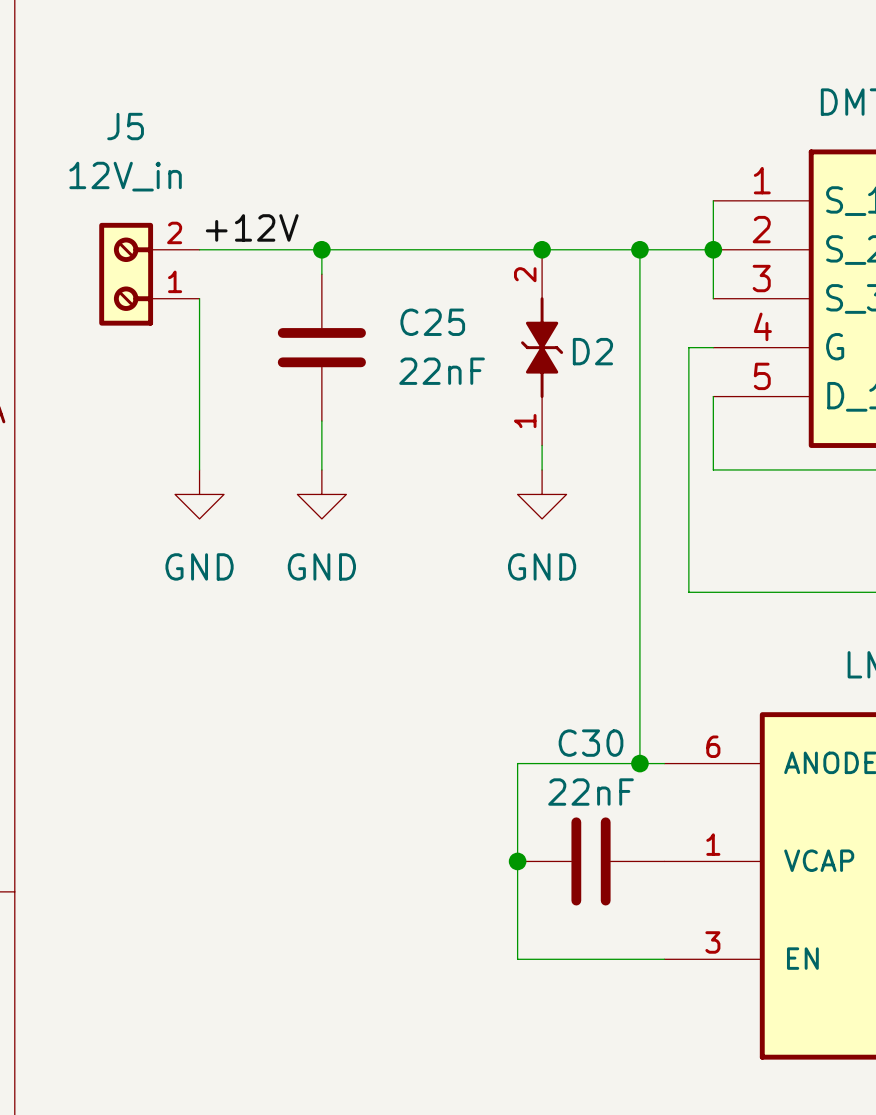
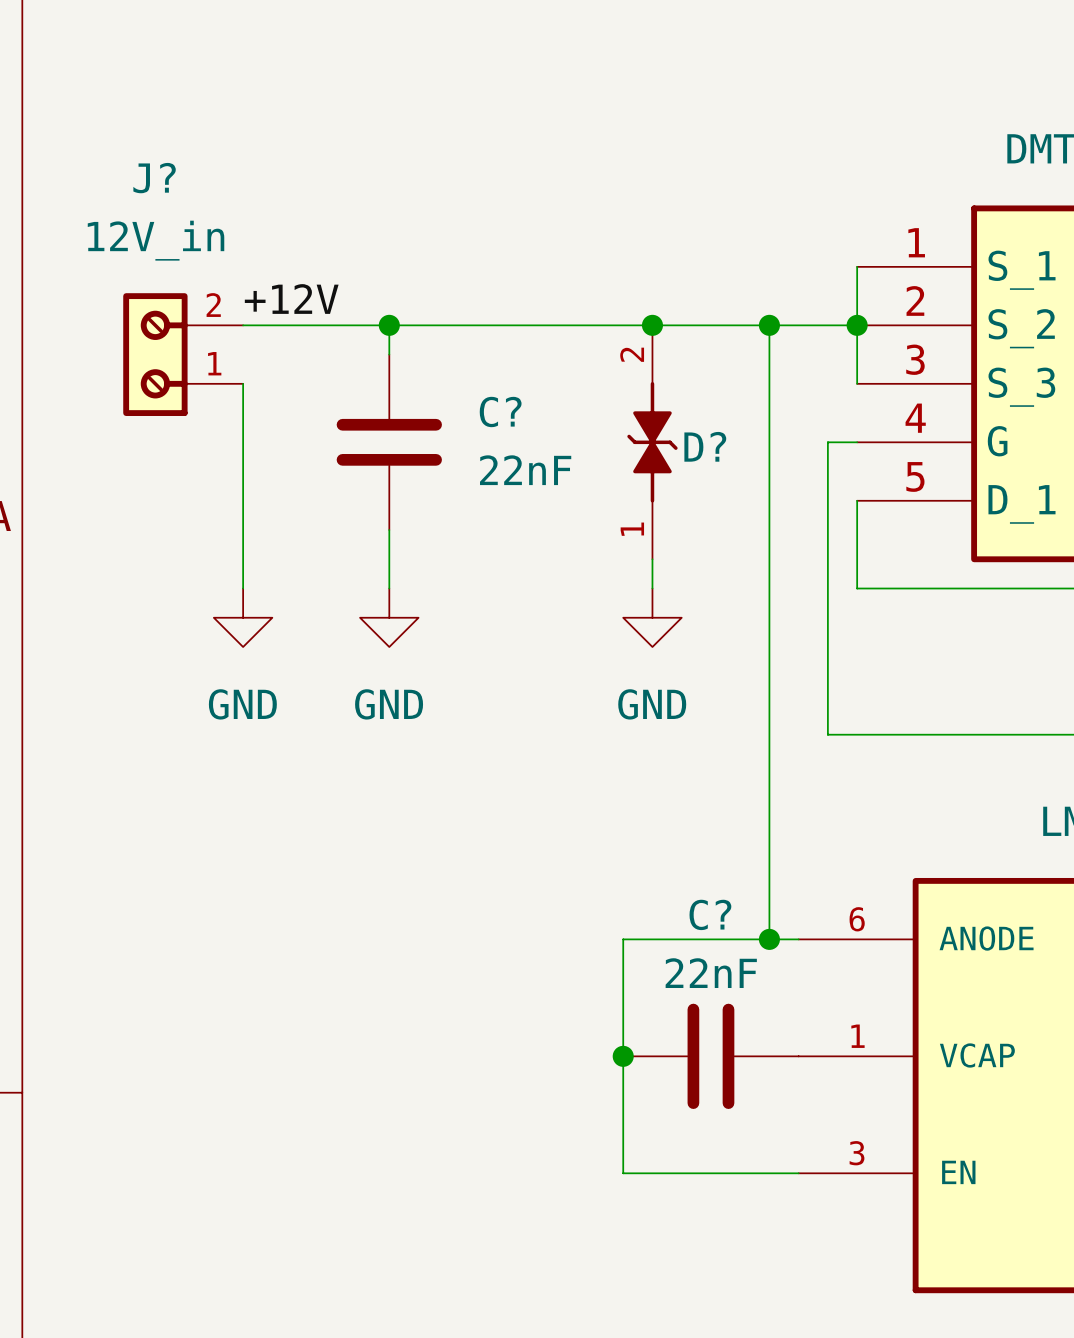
J5 name: J5 (125, 126) -> J? (154, 178)
C25 name: C25 (432, 322) -> C? (500, 412)
D2 name: D2 (592, 351) -> D? (705, 446)
C30 name: C30 (591, 743) -> C? (710, 914)

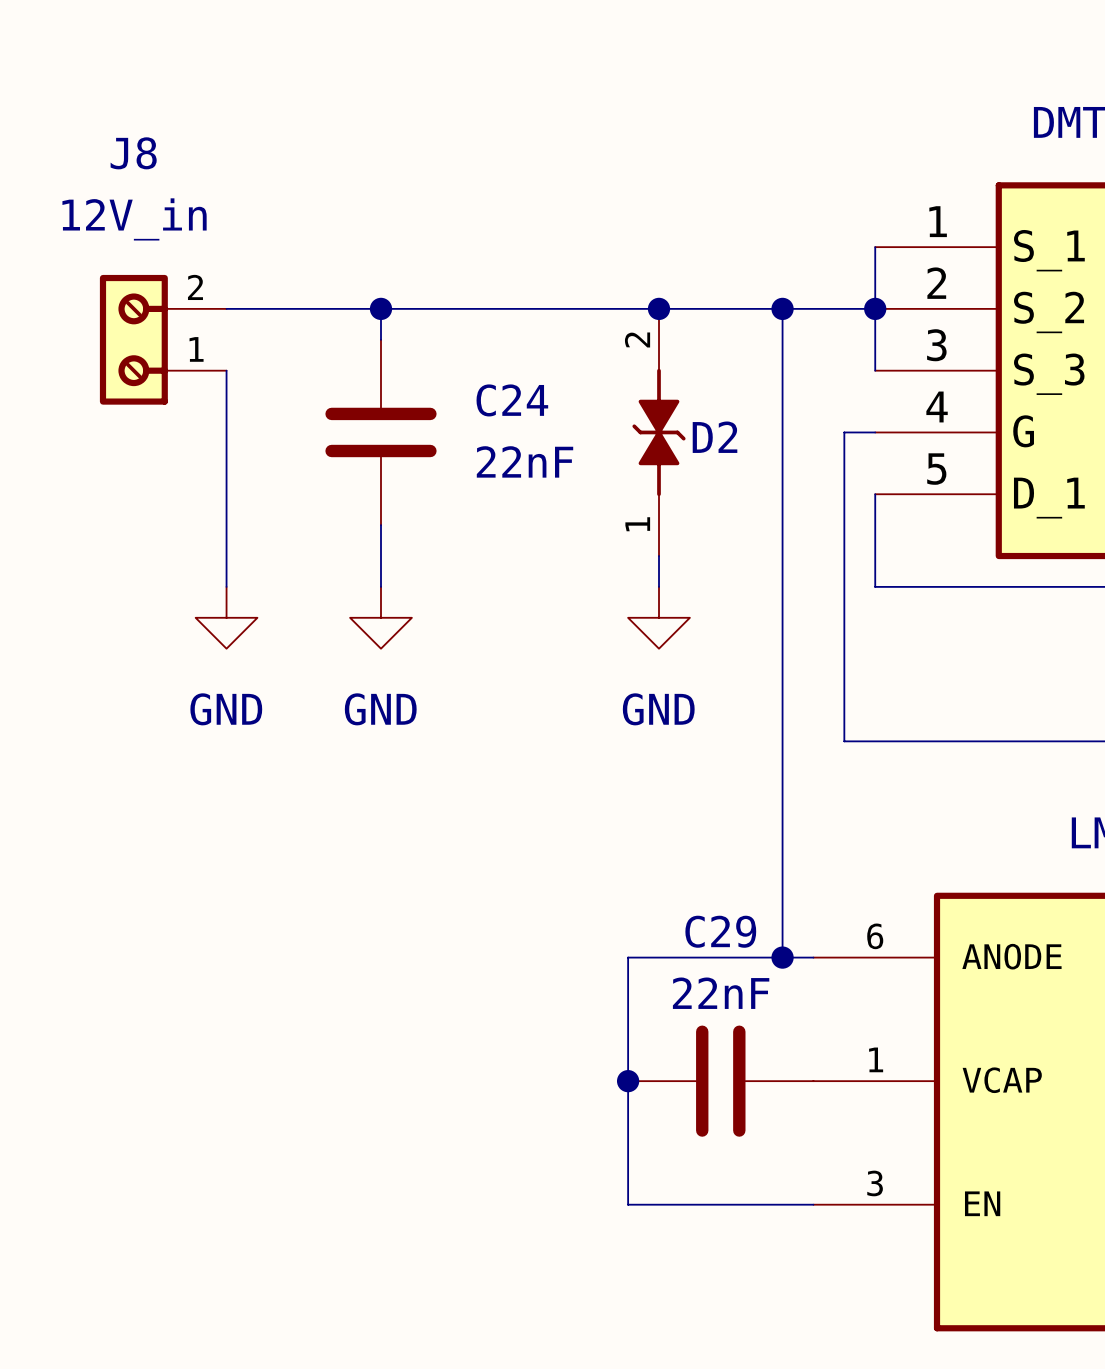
J? name: J? (154, 178) -> J8 (133, 153)
label: +12V (291, 299) -> none
C? name: C? (500, 412) -> C24 (512, 400)
D? name: D? (705, 446) -> D2 (715, 437)
C? name: C? (710, 914) -> C29 (720, 931)

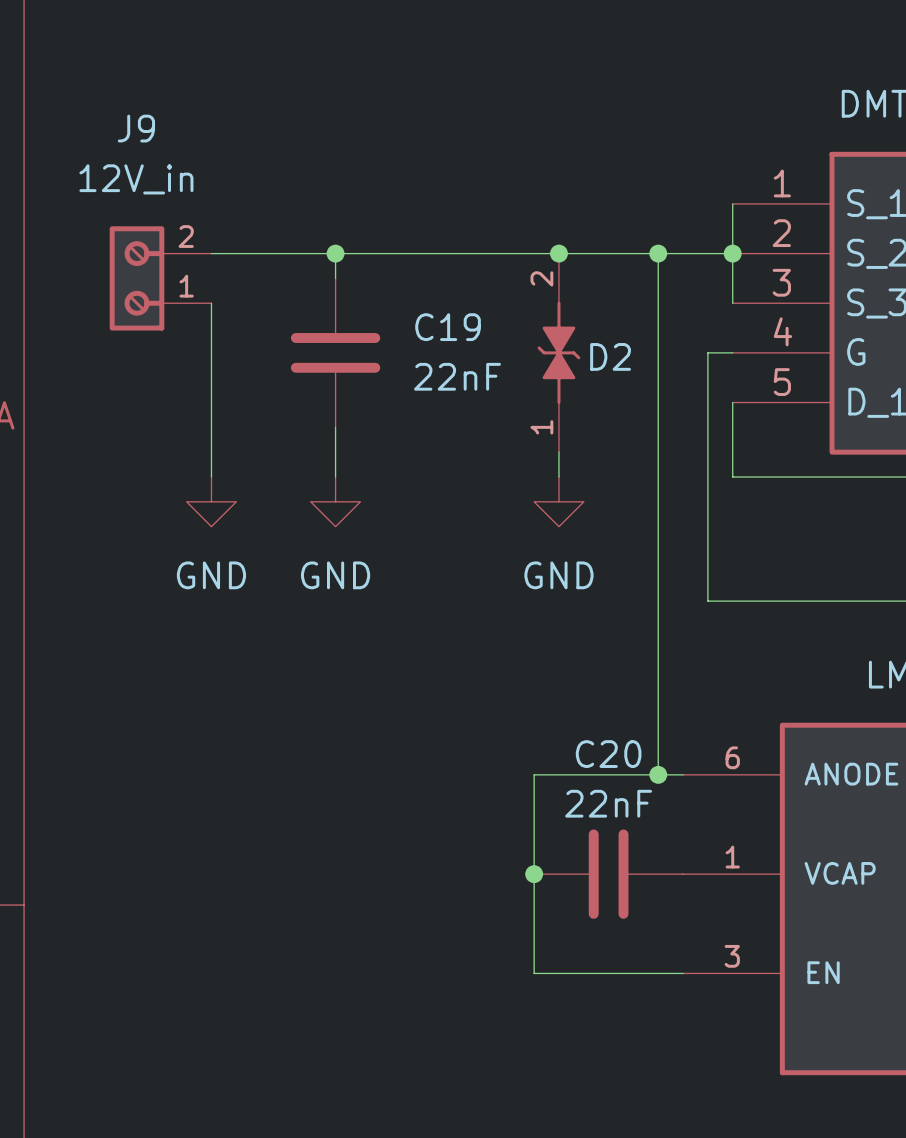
J8 name: J8 (133, 153) -> J9 (136, 128)
C24 name: C24 (512, 400) -> C19 (448, 327)
C29 name: C29 (720, 931) -> C20 (608, 754)

